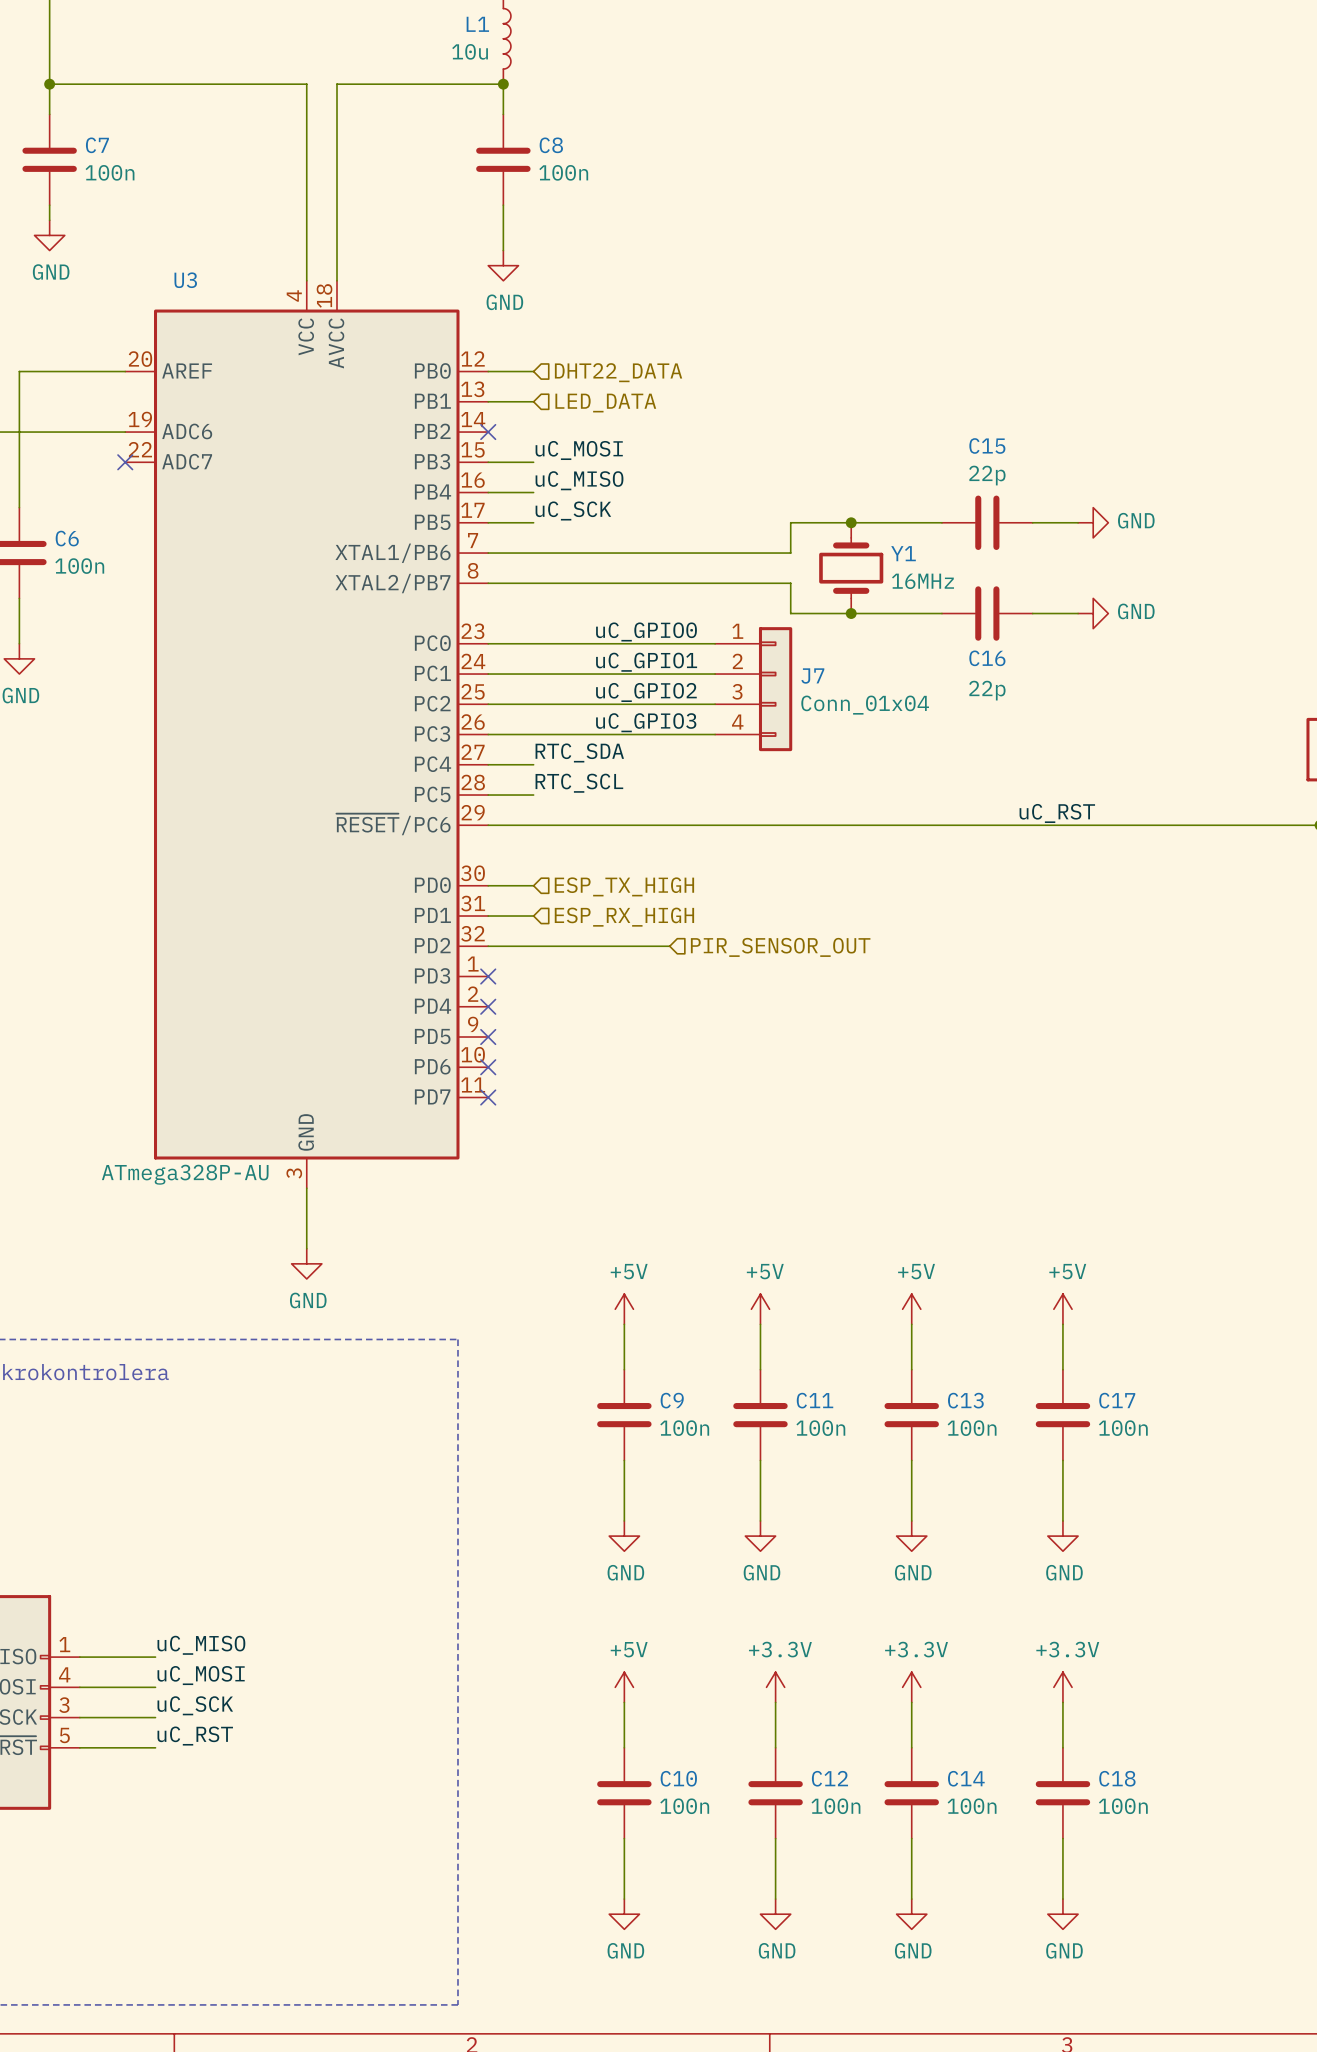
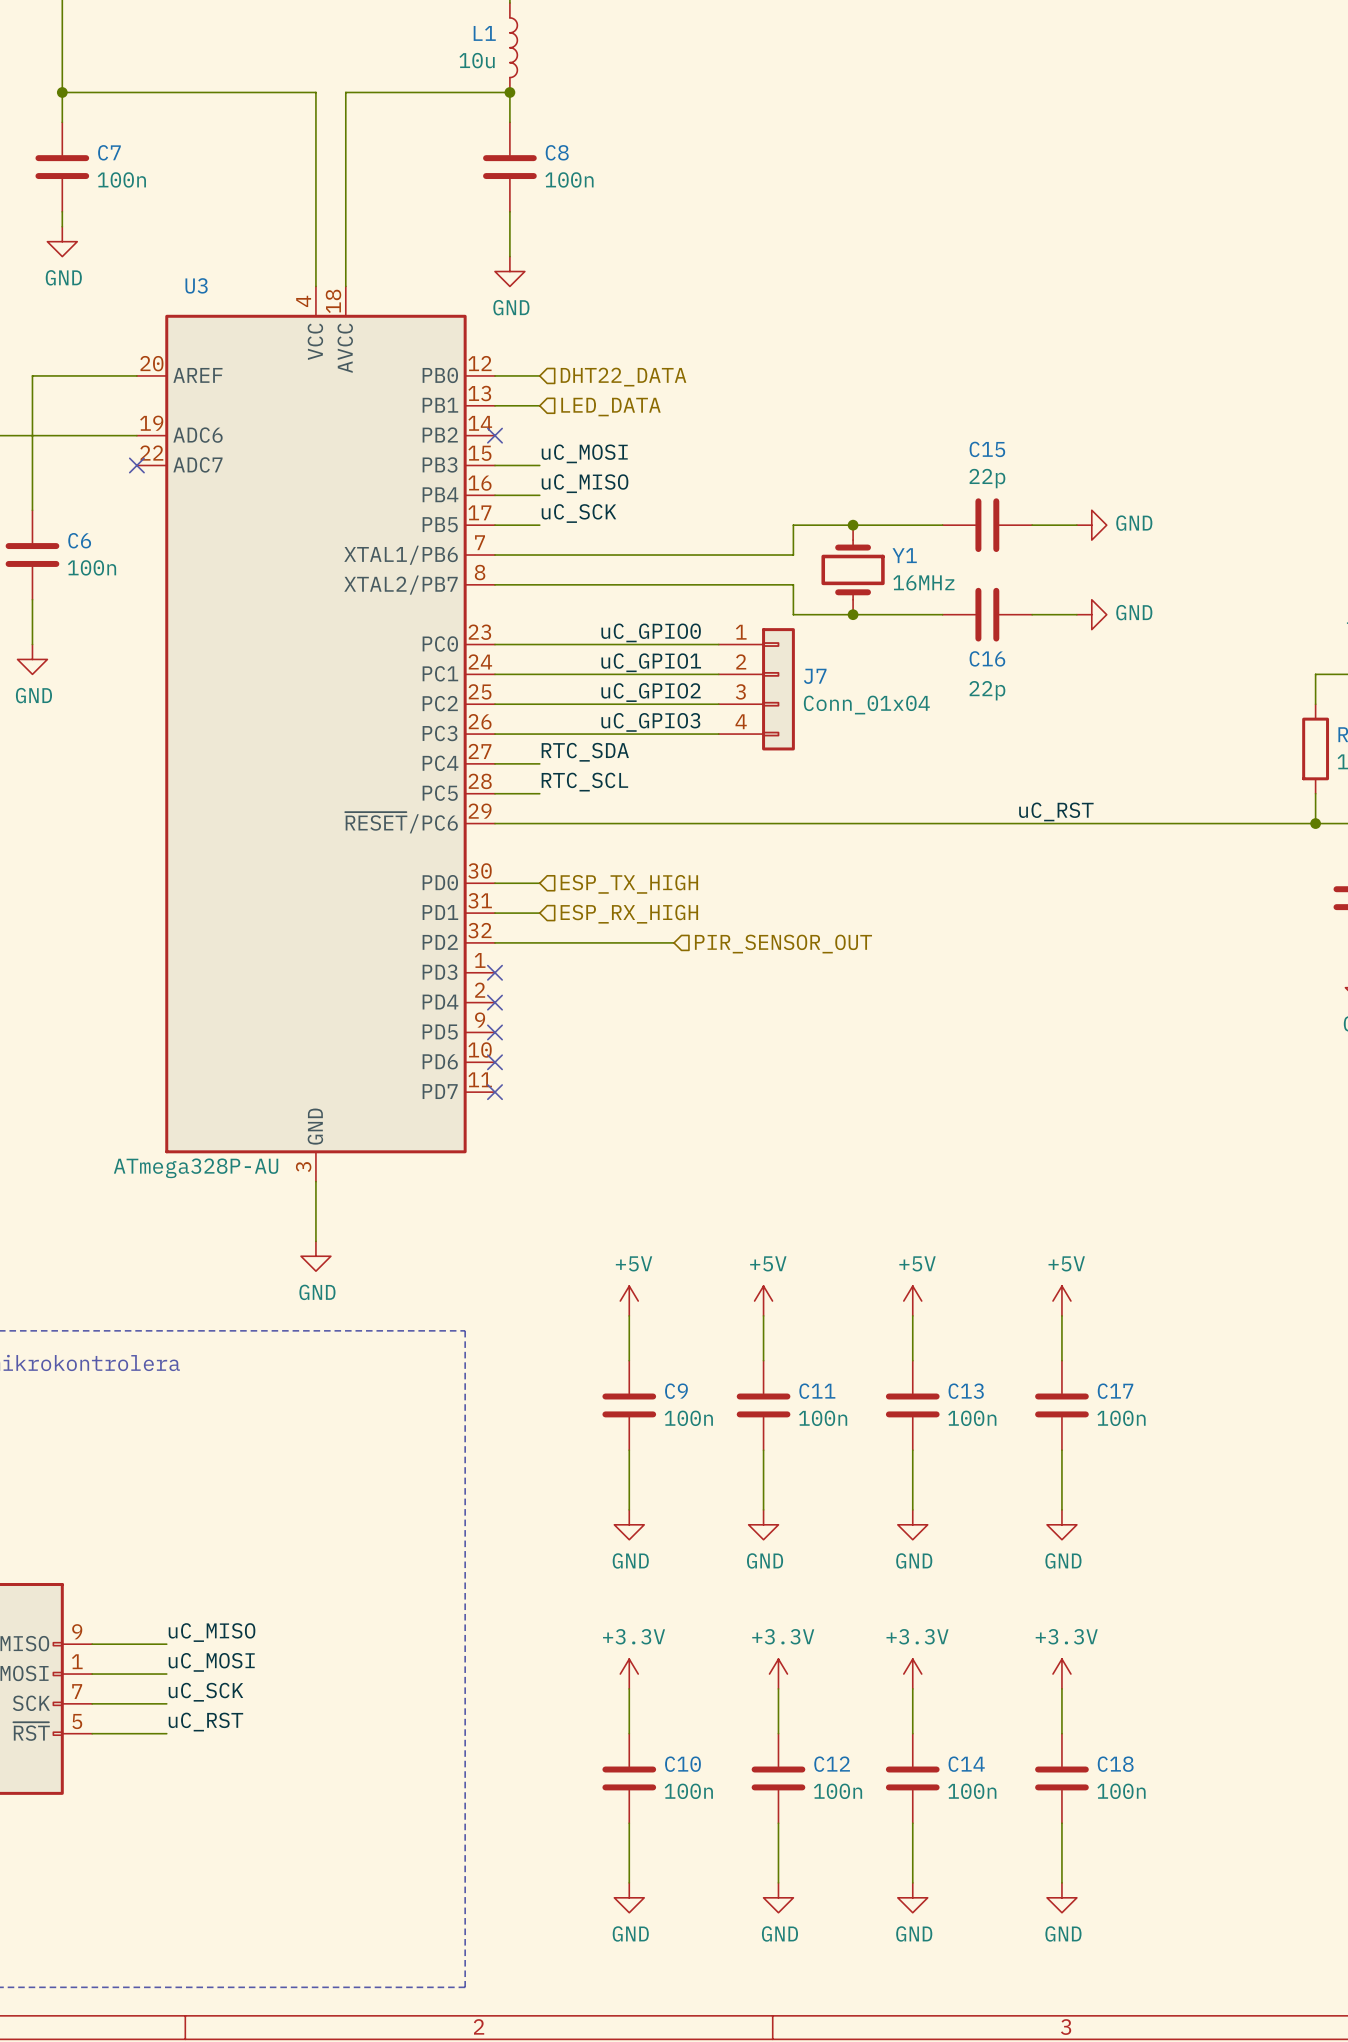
part pin number: 1 (64, 1644) -> 9 (77, 1631)
part pin number: 4 (64, 1674) -> 1 (77, 1661)
power symbol: +5V (624, 1687) -> +3.3V (629, 1674)
part pin number: 3 (64, 1705) -> 7 (77, 1691)

